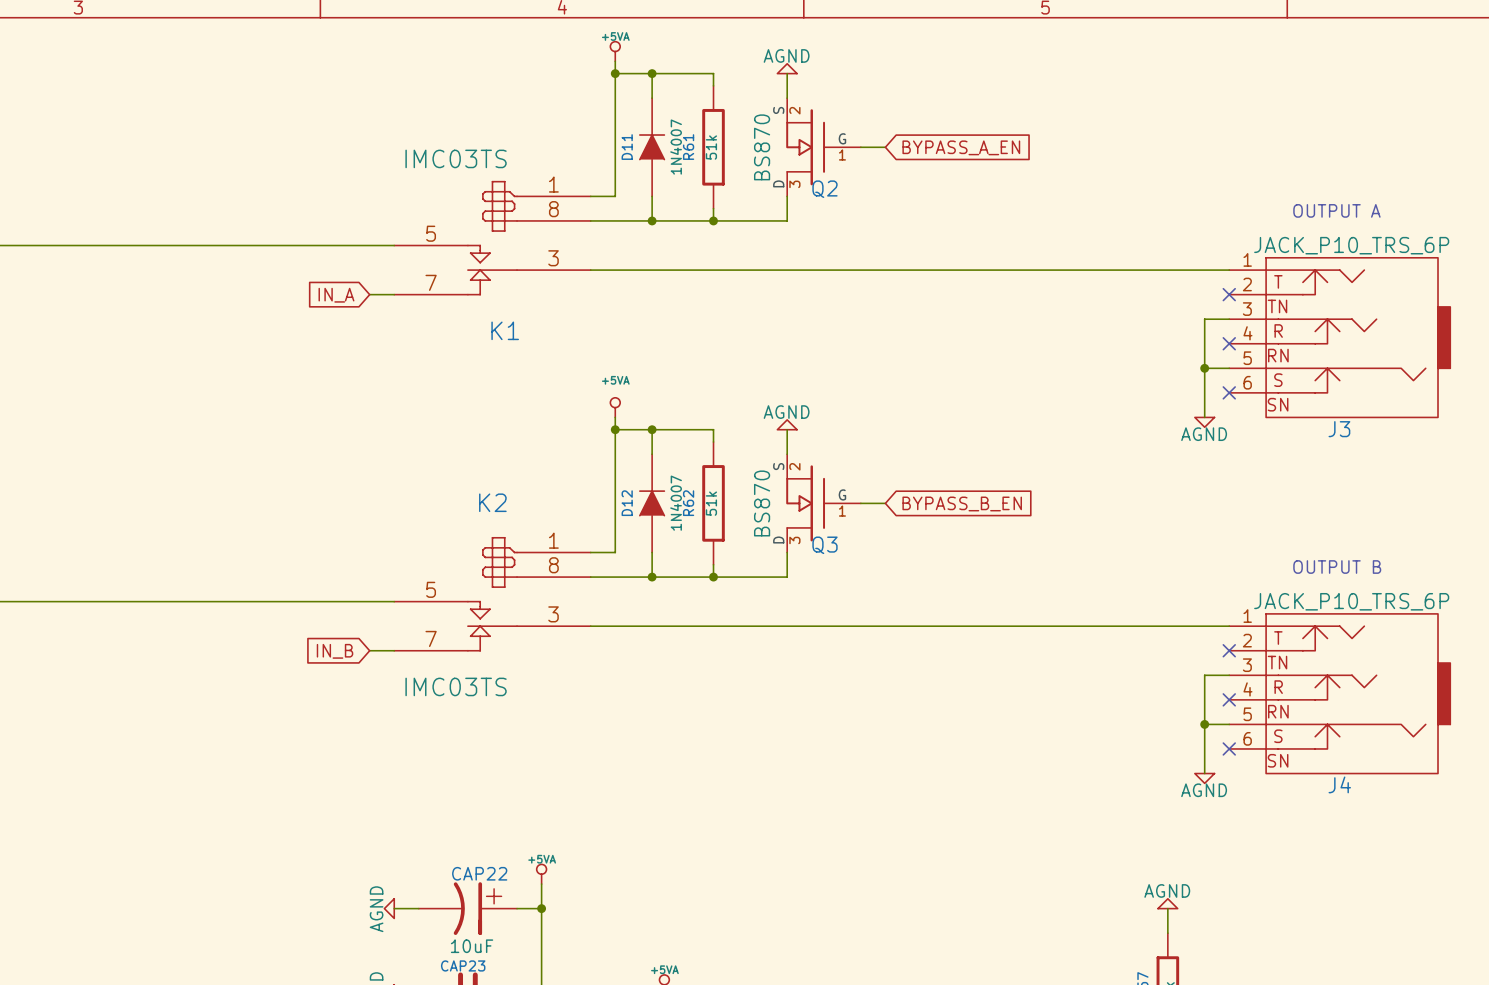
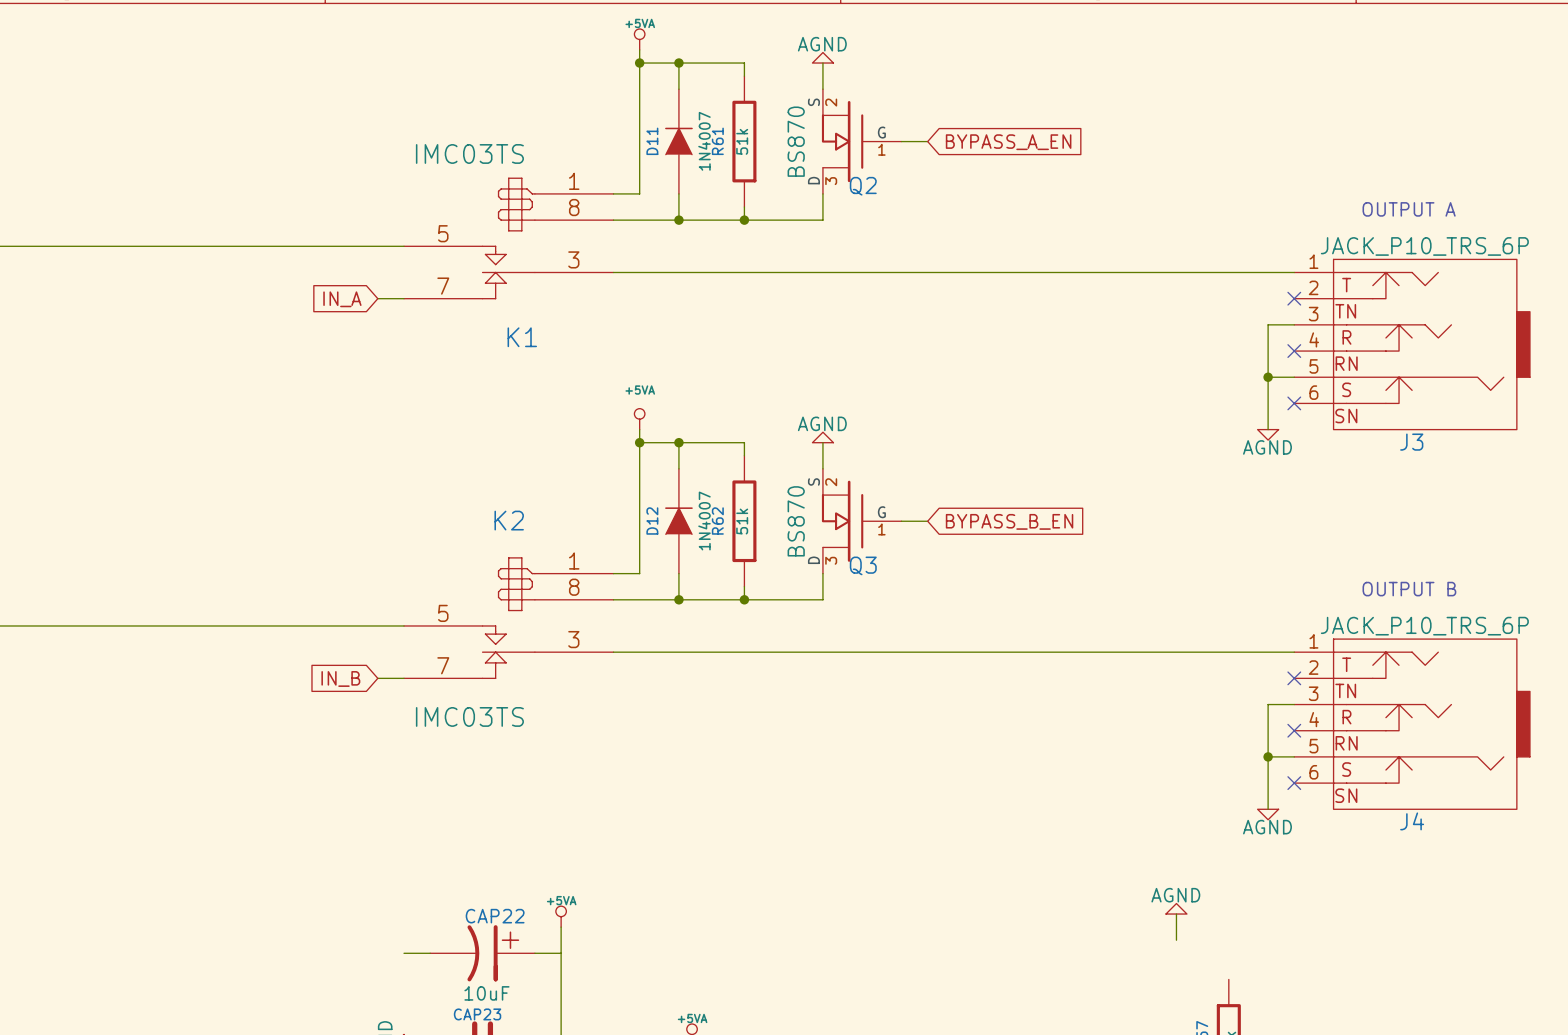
power symbol position: AGND (1167, 903) -> AGND (1176, 908)
power symbol: AGND (389, 908) -> none
junction: (541, 908) -> none
wire: (1167, 908) (1167, 933) -> (1176, 914) (1176, 940)

